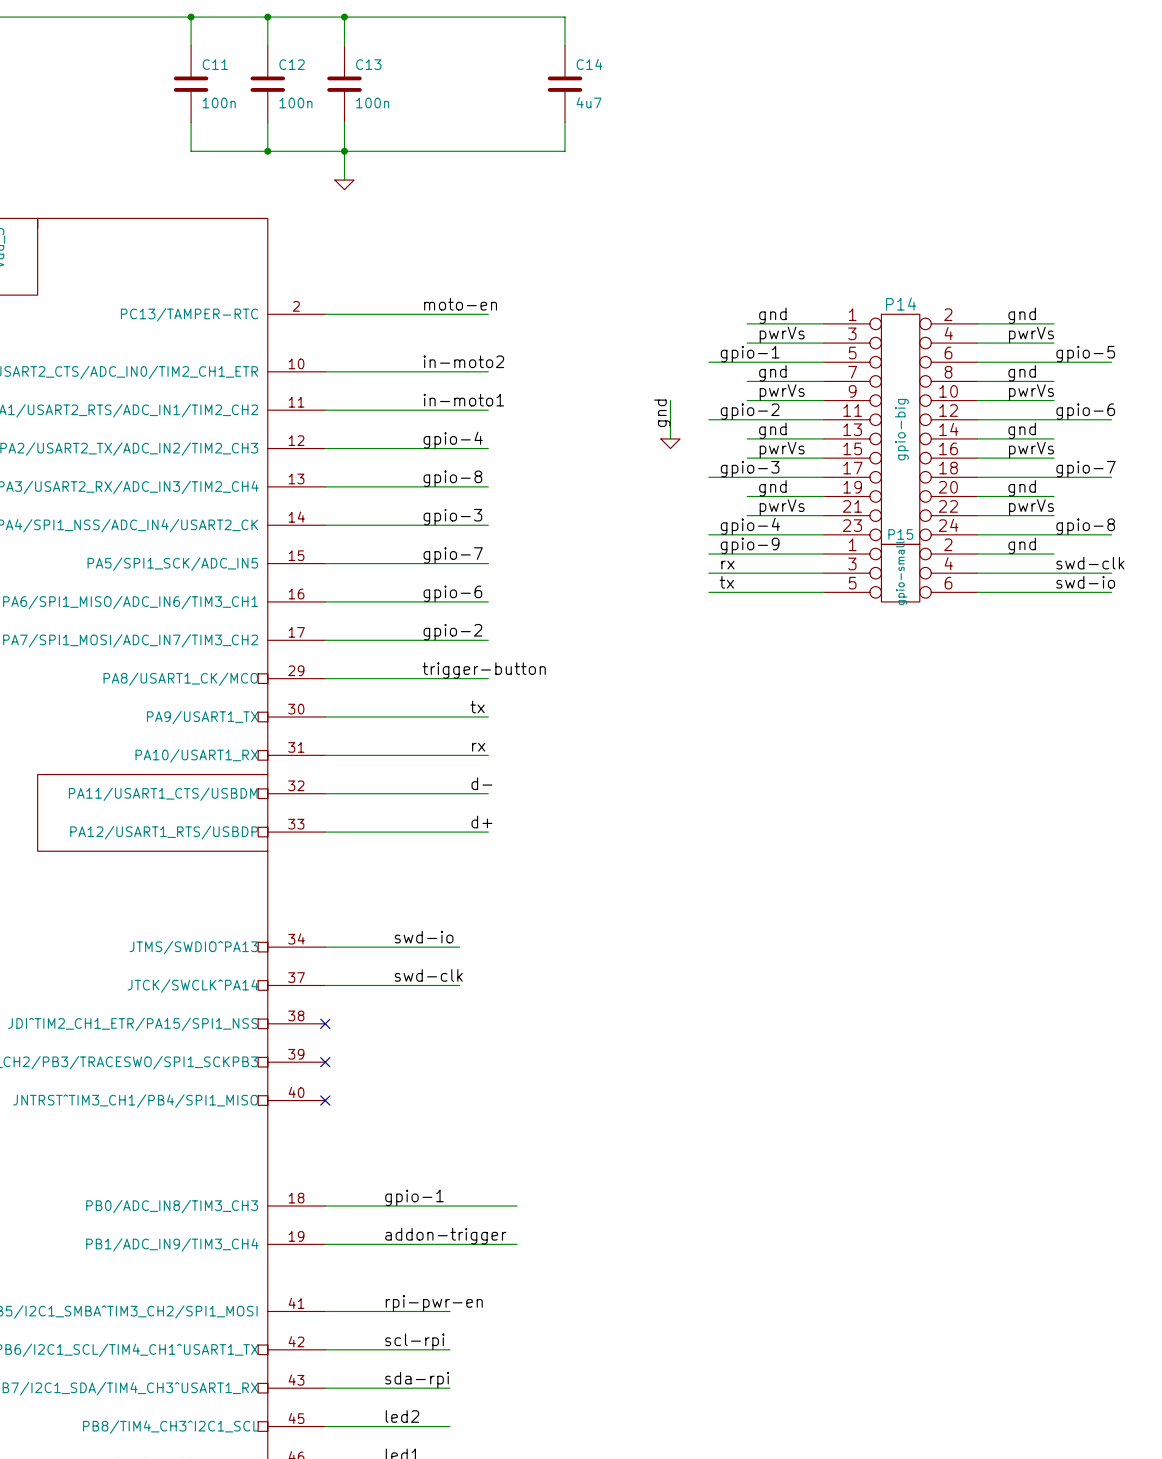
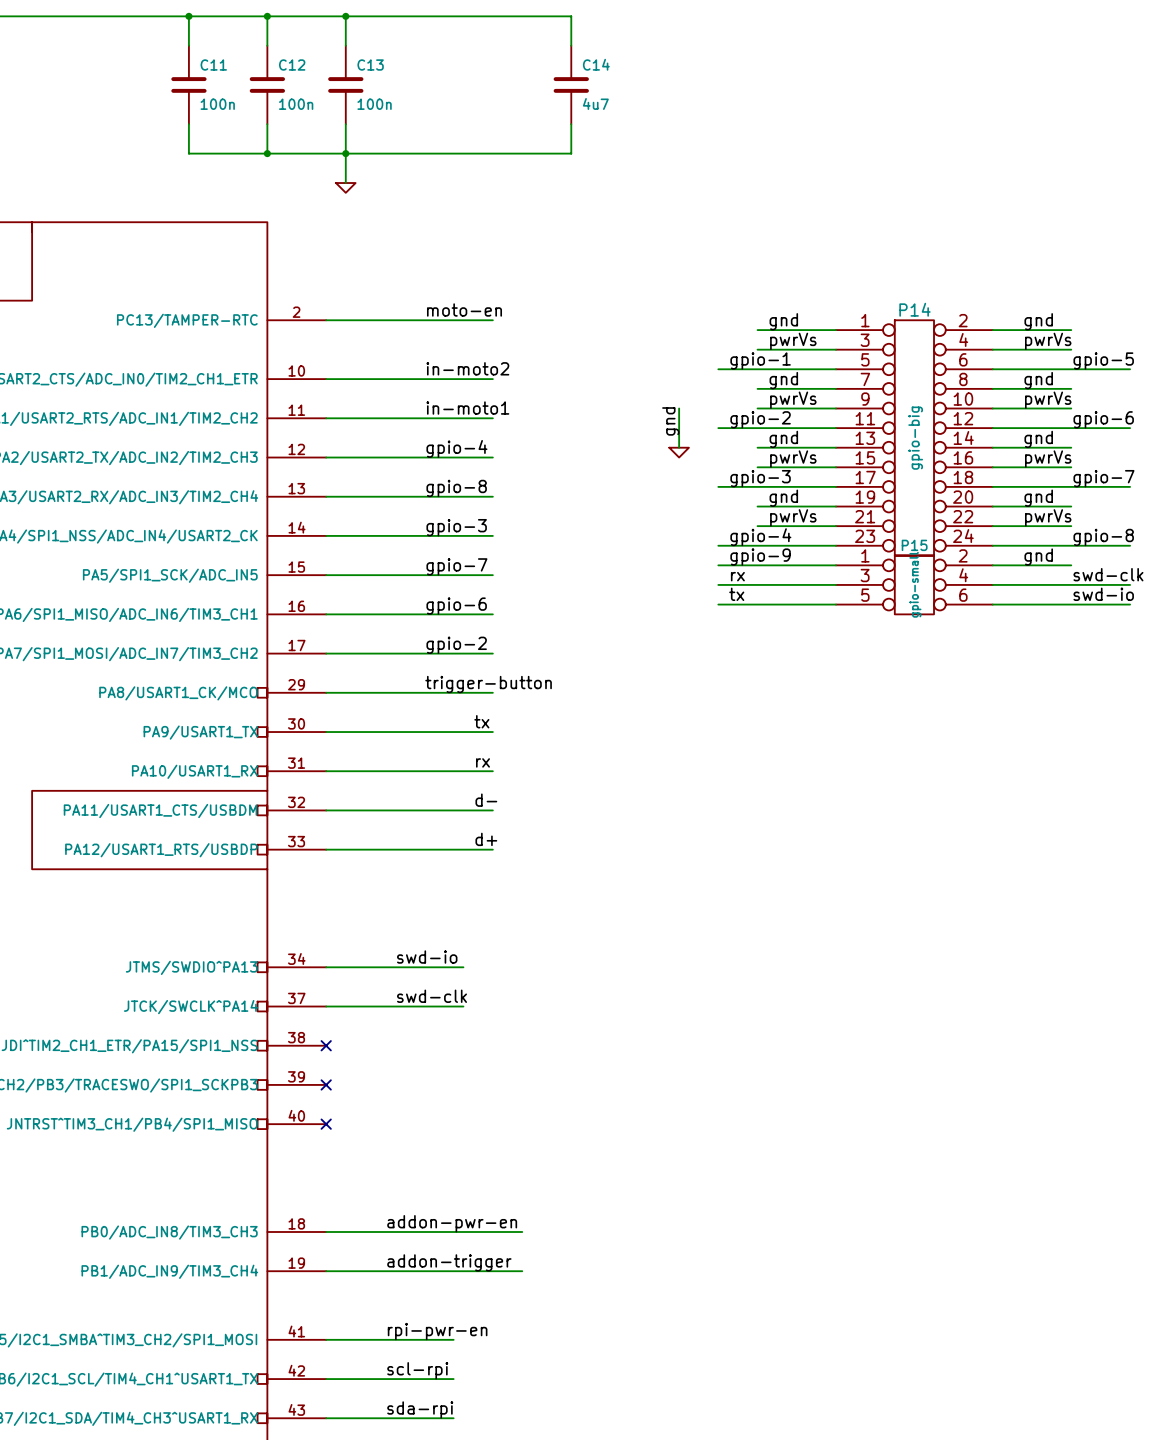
label: gpio-1 (414, 1197) -> addon-pwr-en (452, 1223)

